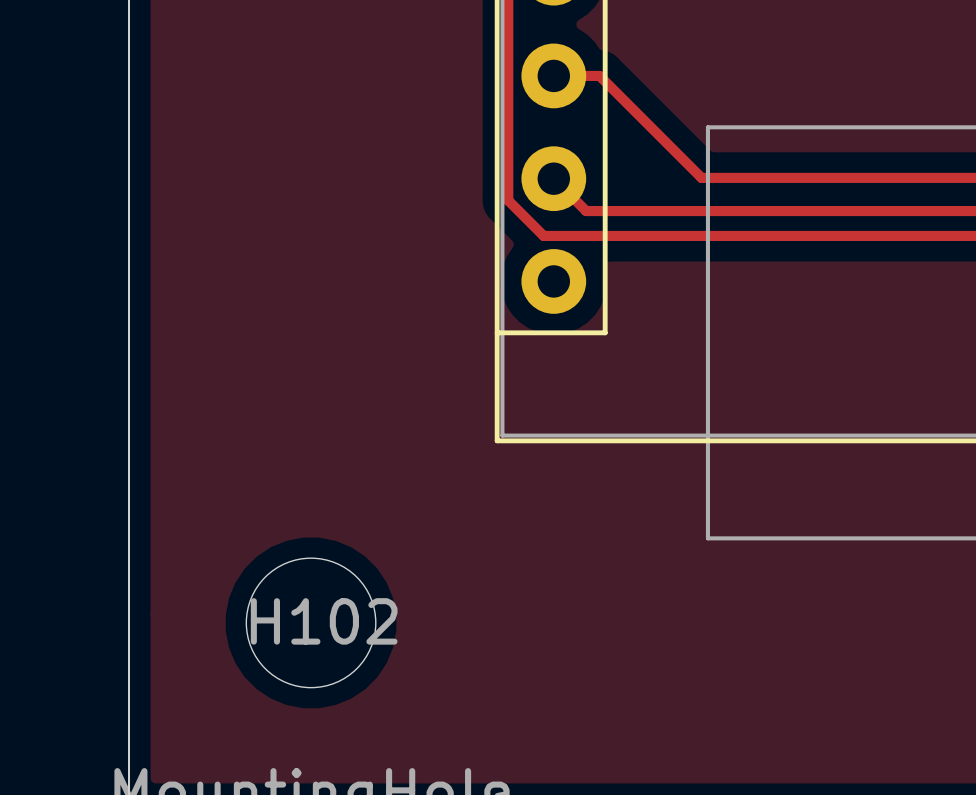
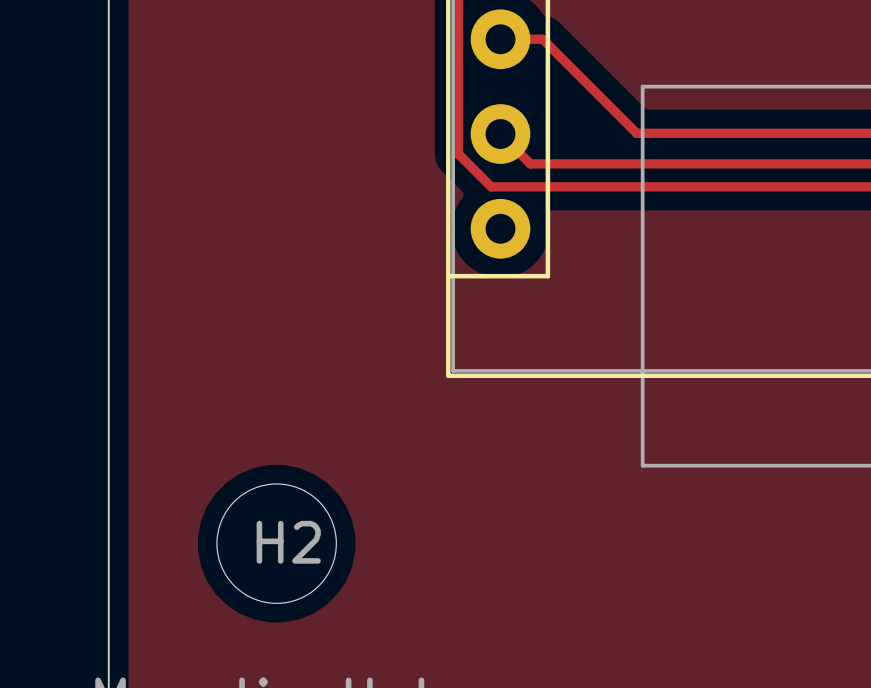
H102 name: H102 (324, 621) -> H2 (288, 542)

